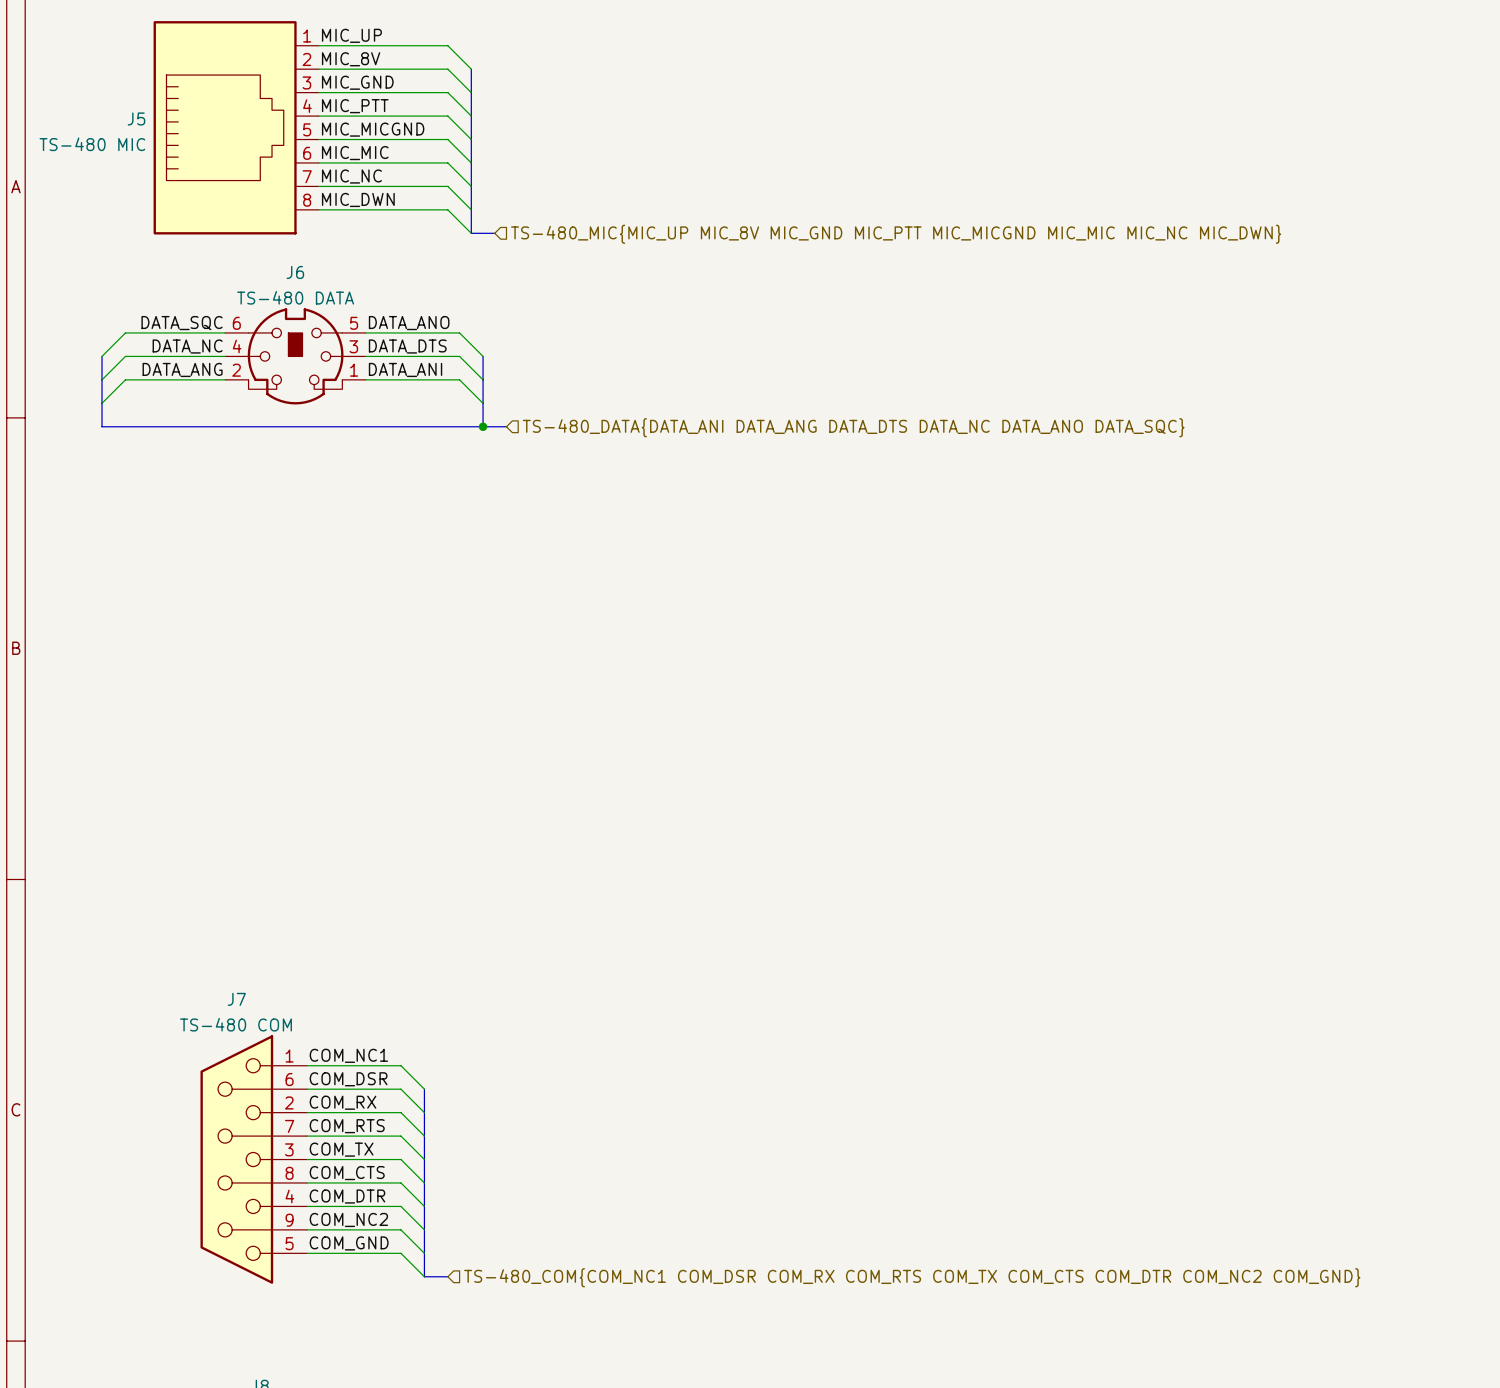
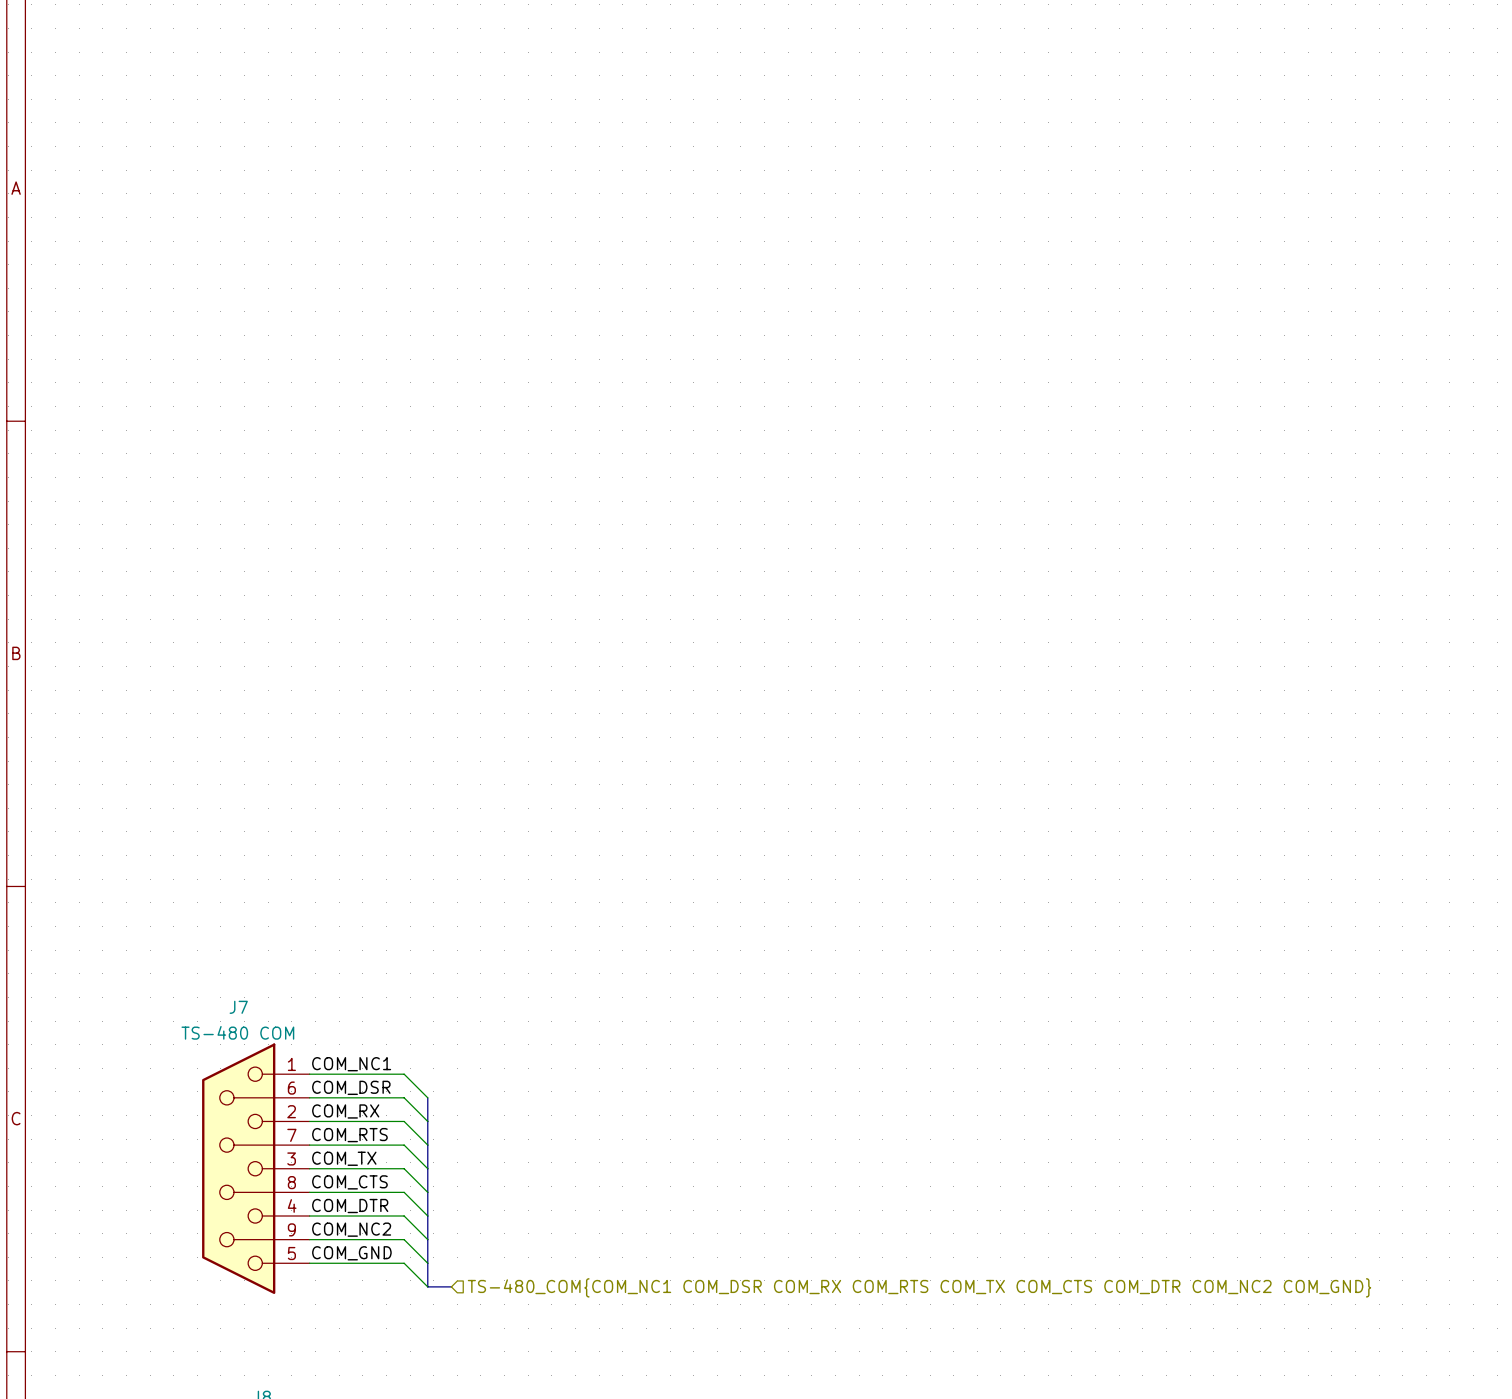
label: MIC_UP (351, 35) -> none
wire: (318, 45) (447, 45) (471, 69) -> none
label: MIC_8V (351, 59) -> none
wire: (318, 69) (447, 69) (471, 92) -> none
bus: (471, 69) (471, 233) (494, 233) -> none
label: MIC_GND (357, 82) -> none
wire: (318, 92) (447, 92) (471, 116) -> none
label: MIC_PTT (355, 106) -> none
wire: (318, 116) (447, 116) (471, 139) -> none
J5: TS-480 MIC (236, 127) -> none
label: MIC_MICGND (373, 129) -> none
wire: (318, 139) (447, 139) (471, 162) -> none
label: MIC_MIC (355, 153) -> none
wire: (318, 162) (447, 162) (471, 186) -> none
label: MIC_NC (351, 176) -> none
wire: (318, 186) (447, 186) (471, 209) -> none
label: MIC_DWN (358, 199) -> none
wire: (318, 209) (447, 209) (471, 233) -> none
hierarchical label: TS-480_MIC{MIC_UP MIC_8V MIC_GND MIC_PTT MIC_MICGND MIC_MIC MIC_NC MIC_DWN} (896, 234) -> none
label: DATA_SQC (182, 323) -> none
label: DATA_ANO (409, 323) -> none
wire: (225, 332) (125, 332) (102, 356) -> none
wire: (365, 332) (459, 332) (483, 356) -> none
label: DATA_NC (187, 346) -> none
label: DATA_DTS (407, 346) -> none
bus: (102, 356) (102, 426) (506, 426) -> none
wire: (225, 356) (125, 356) (102, 379) -> none
J6: TS-480 DATA (295, 356) -> none
wire: (365, 356) (459, 356) (483, 379) -> none
bus: (483, 356) (483, 426) -> none
label: DATA_ANG (182, 369) -> none
label: DATA_ANI (405, 369) -> none
wire: (225, 379) (125, 379) (102, 403) -> none
wire: (365, 379) (459, 379) (483, 403) -> none
junction: (483, 426) -> none
hierarchical label: TS-480_DATA{DATA_ANI DATA_ANG DATA_DTS DATA_NC DATA_ANO DATA_SQC} (853, 427) -> none

